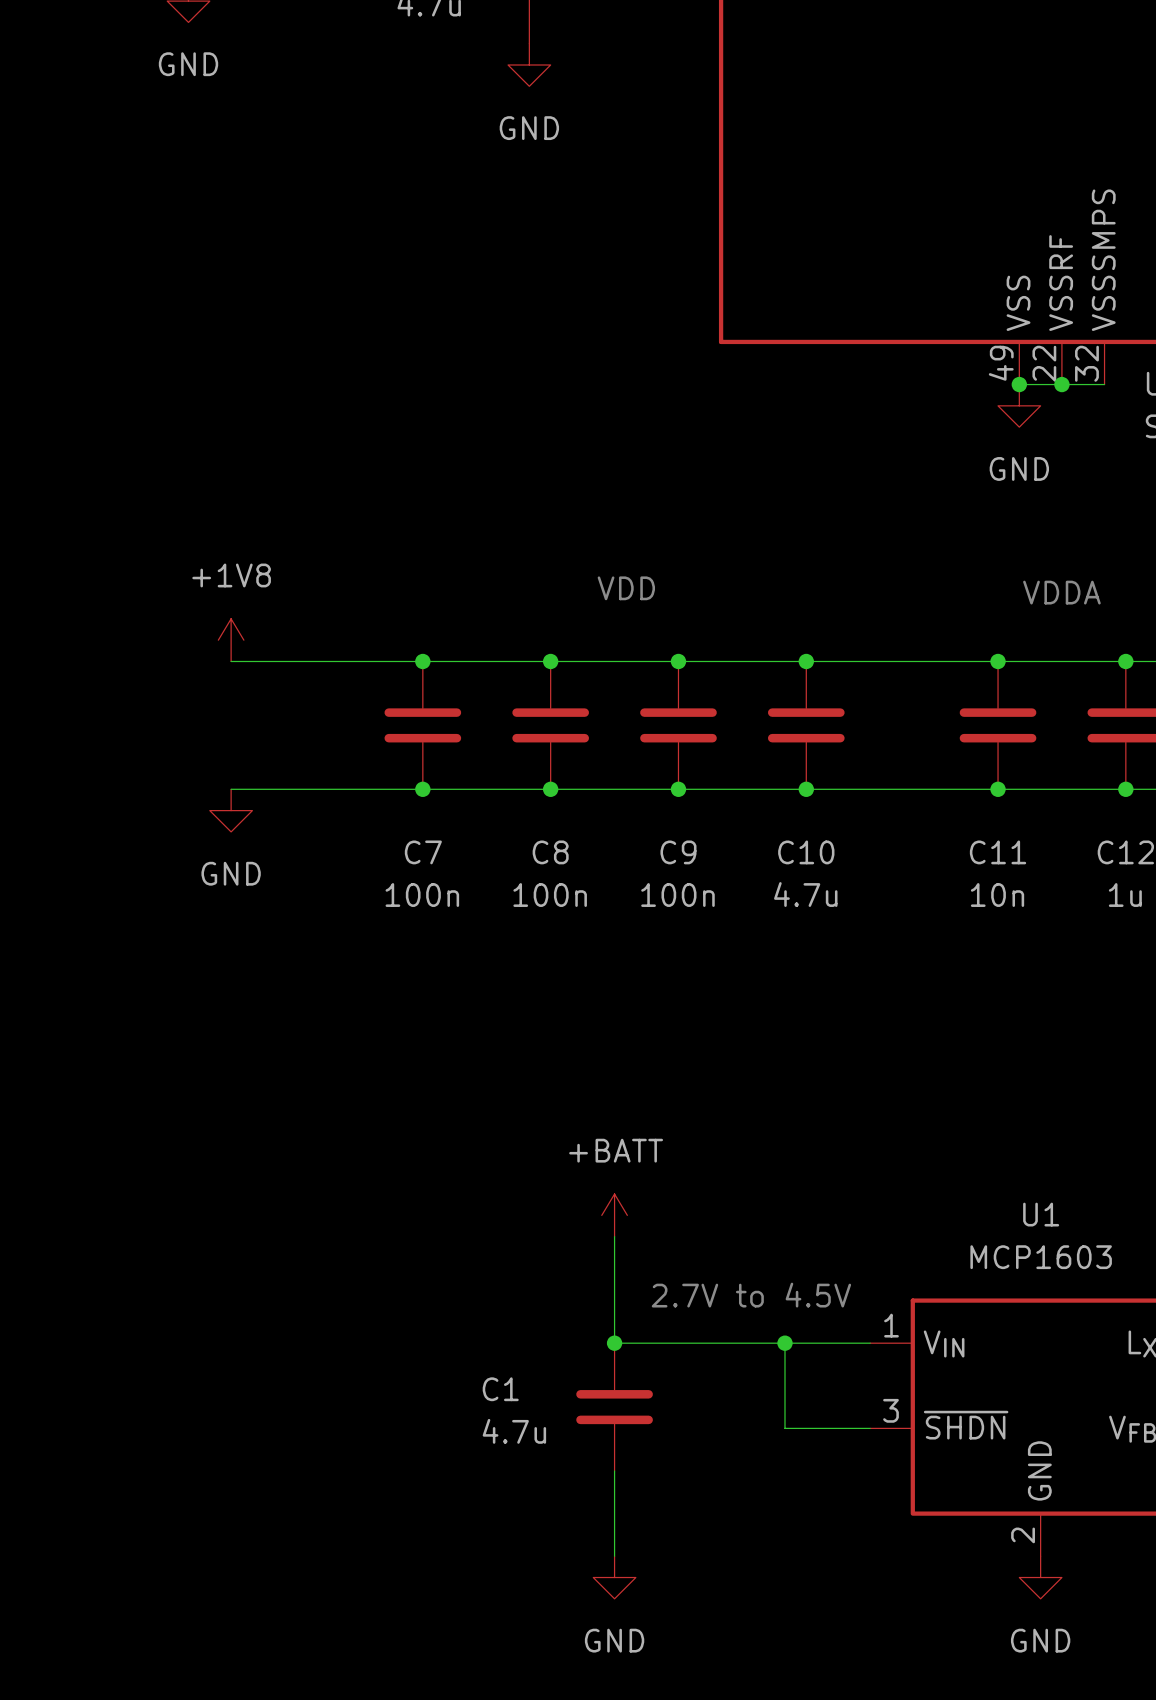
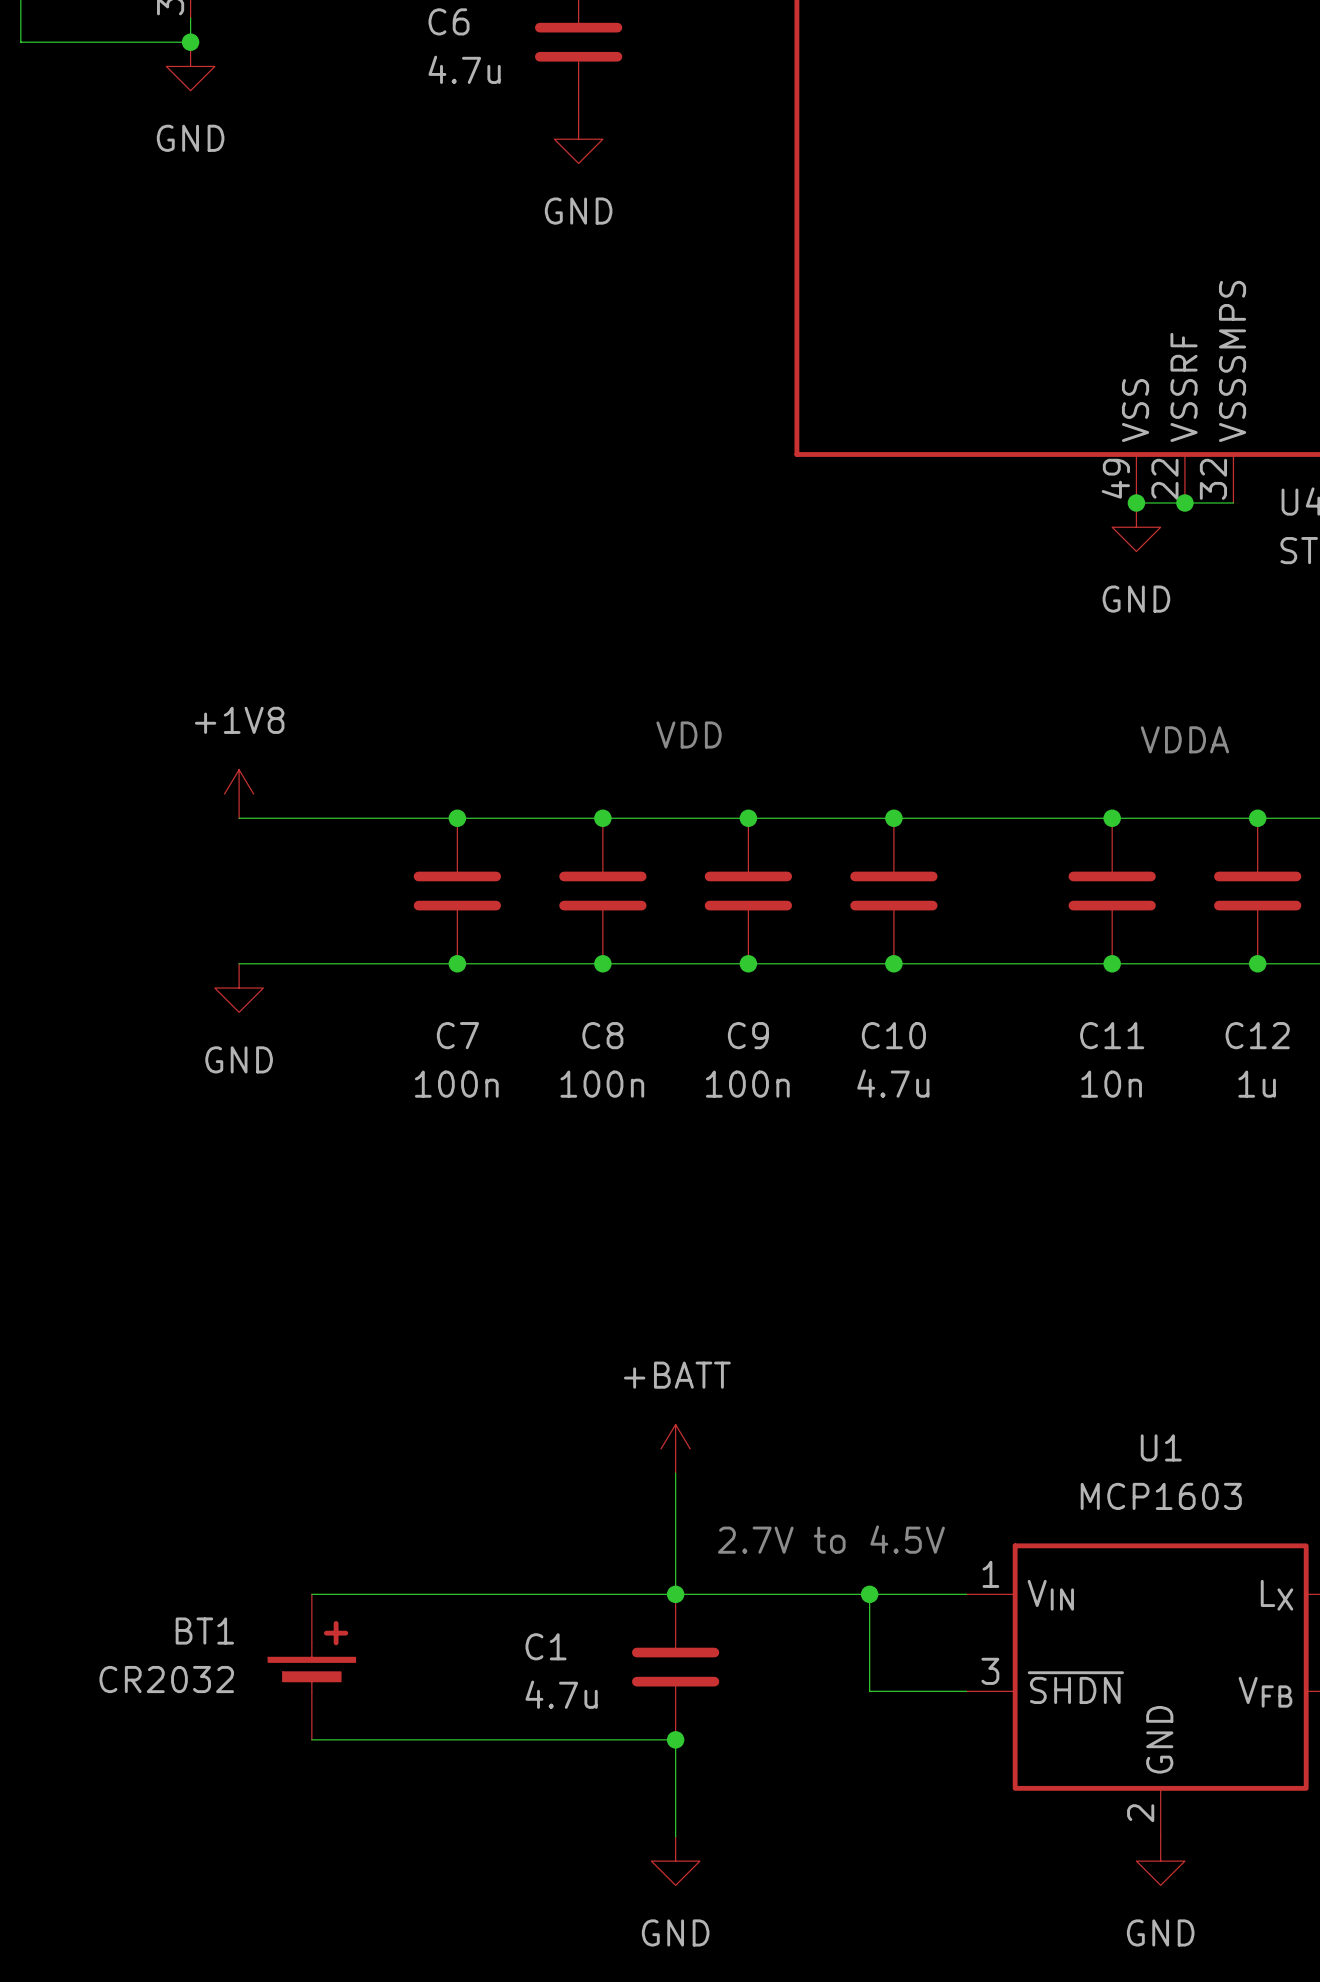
wire: none -> (311, 1594) (675, 1594)
BT1: none -> CR2032 (311, 1667)
wire: none -> (311, 1739) (675, 1739)
junction: none -> (675, 1739)

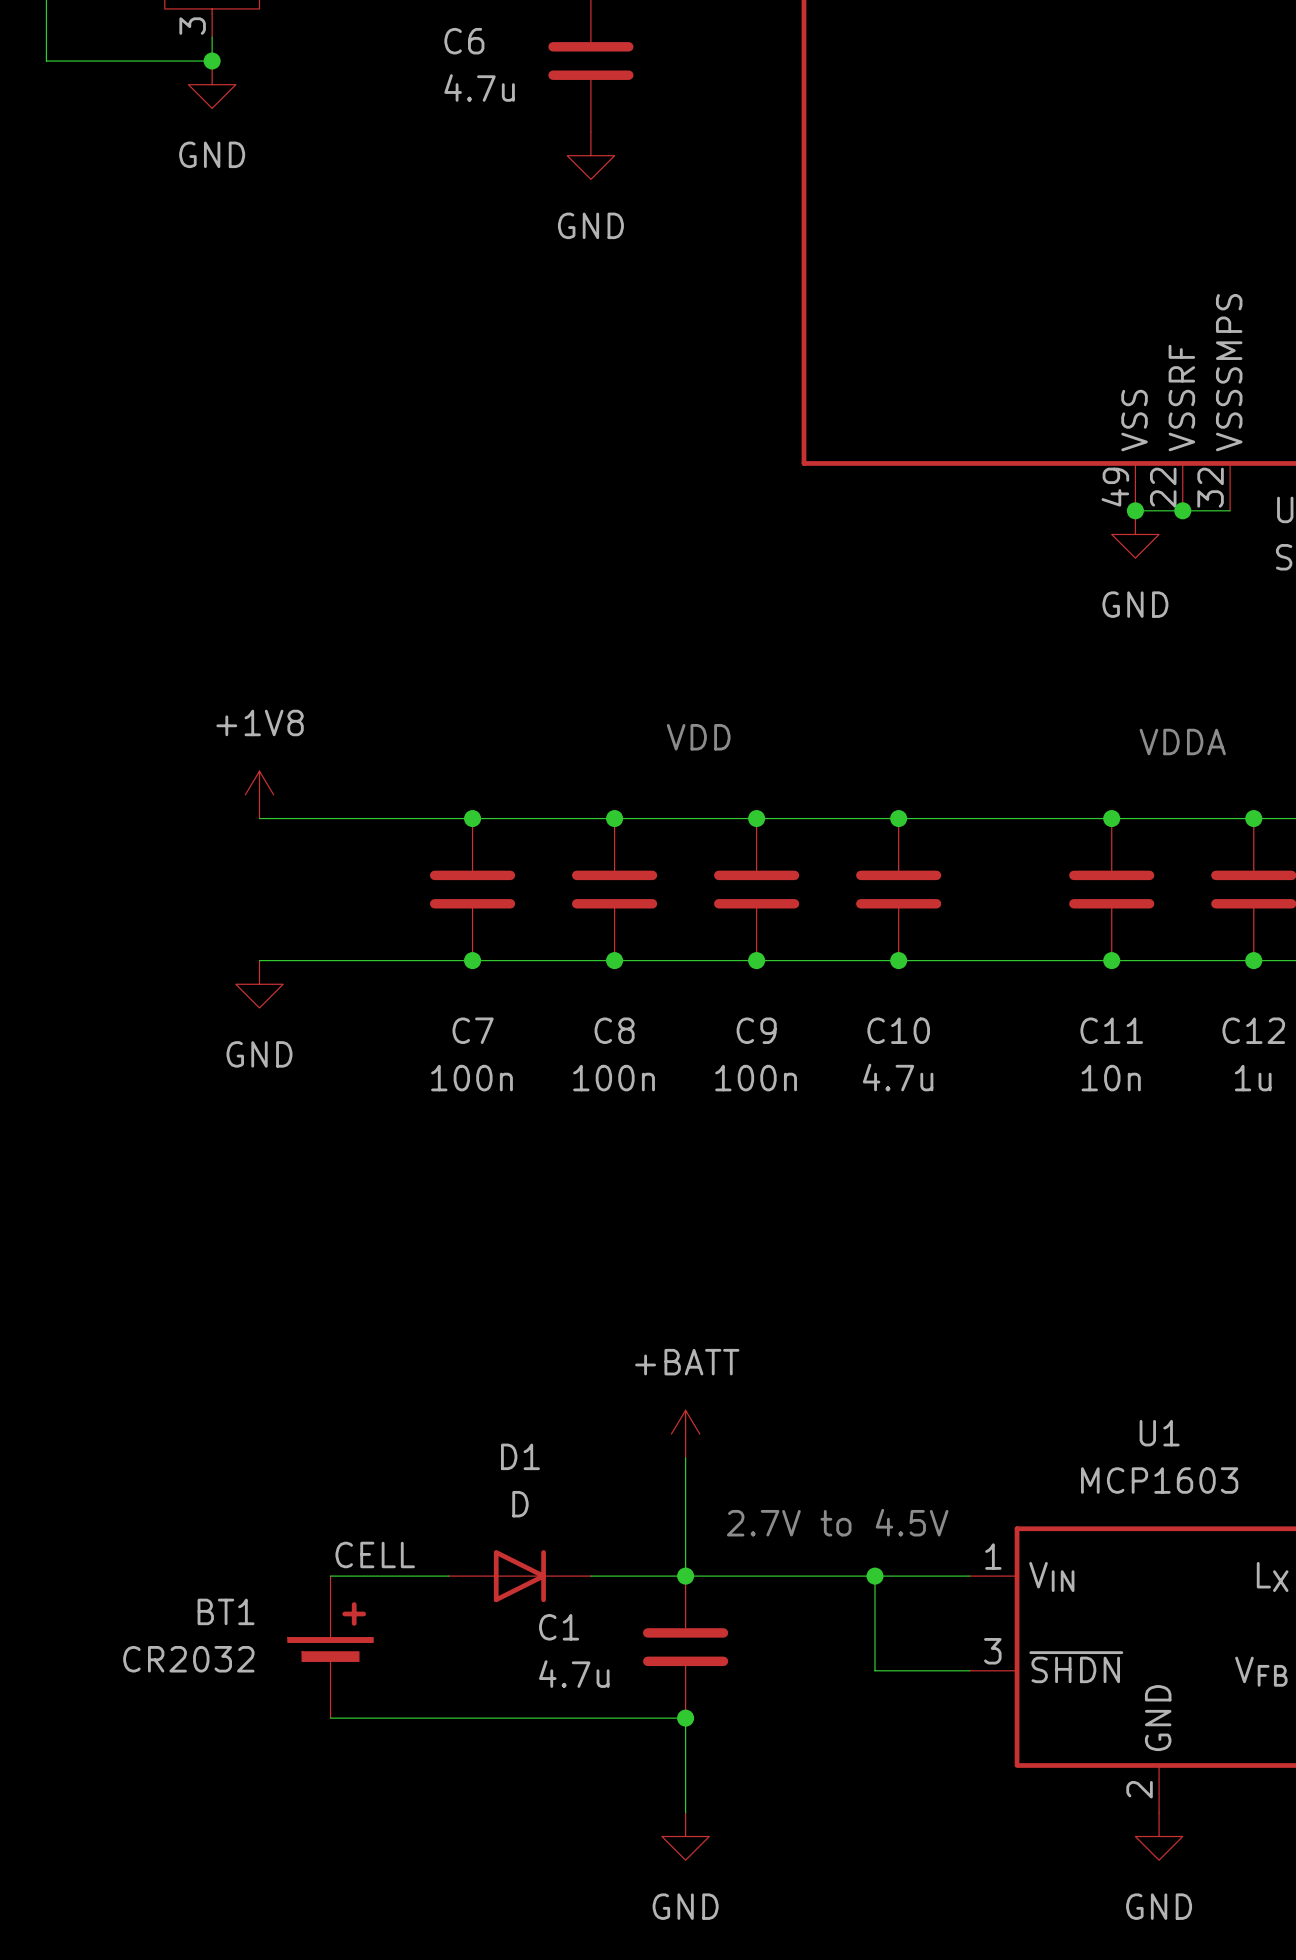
label: none -> CELL (375, 1554)
D1: none -> D (519, 1576)

